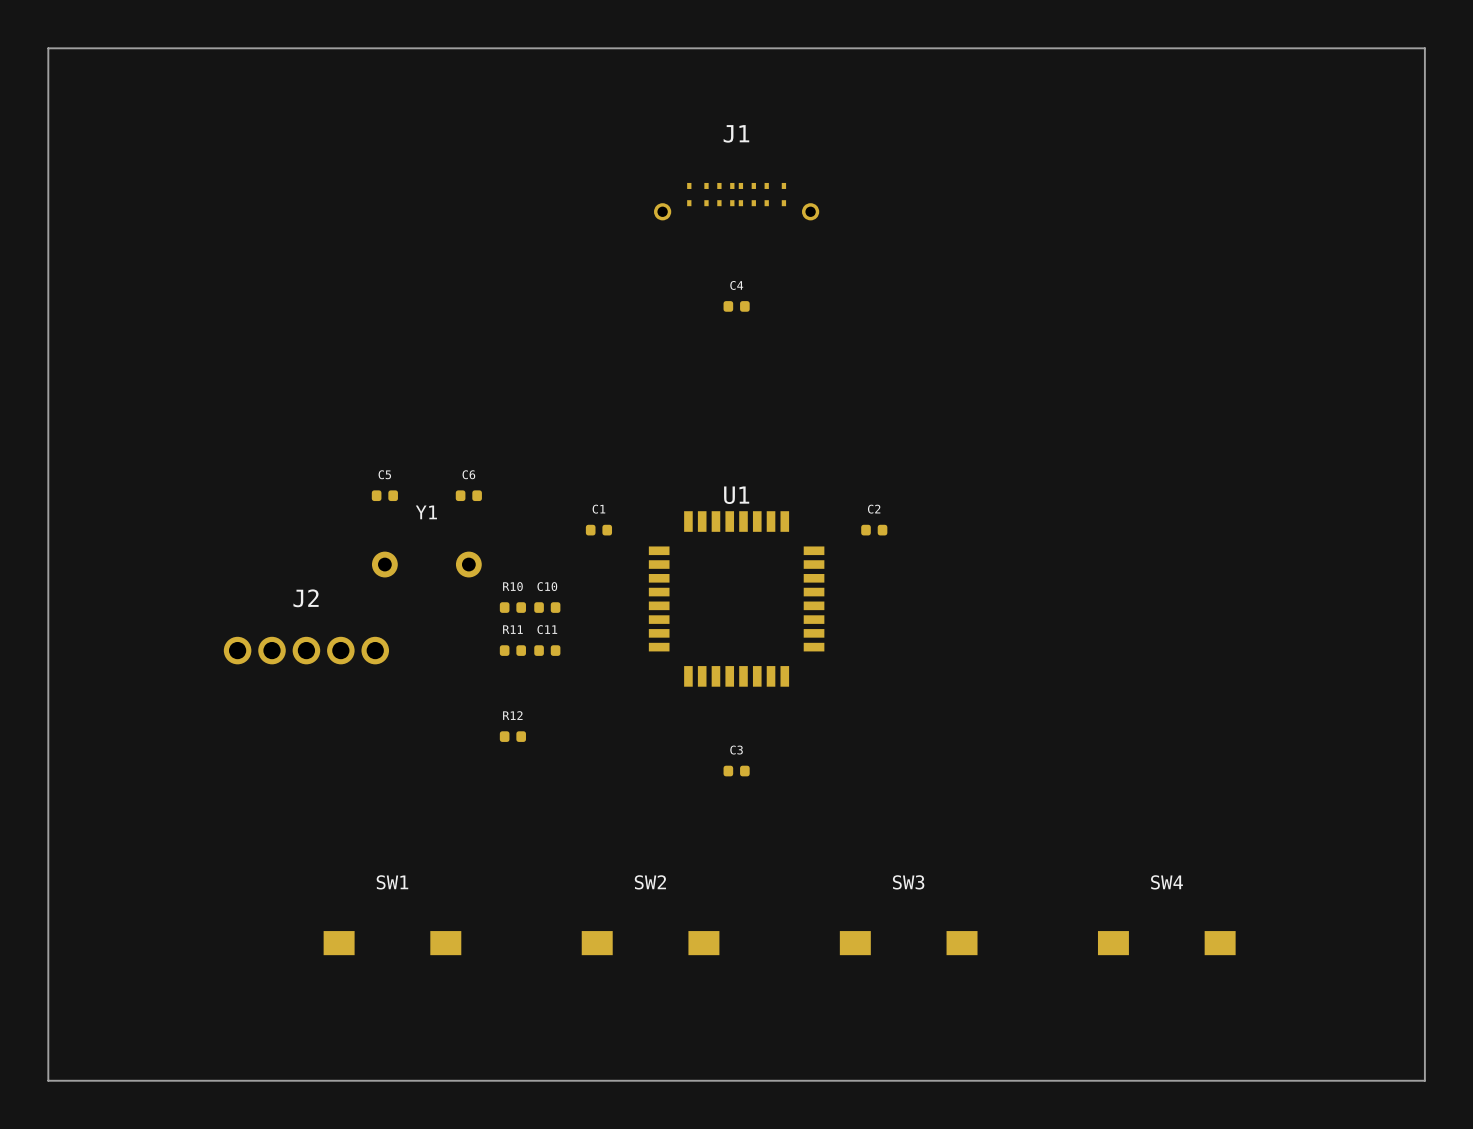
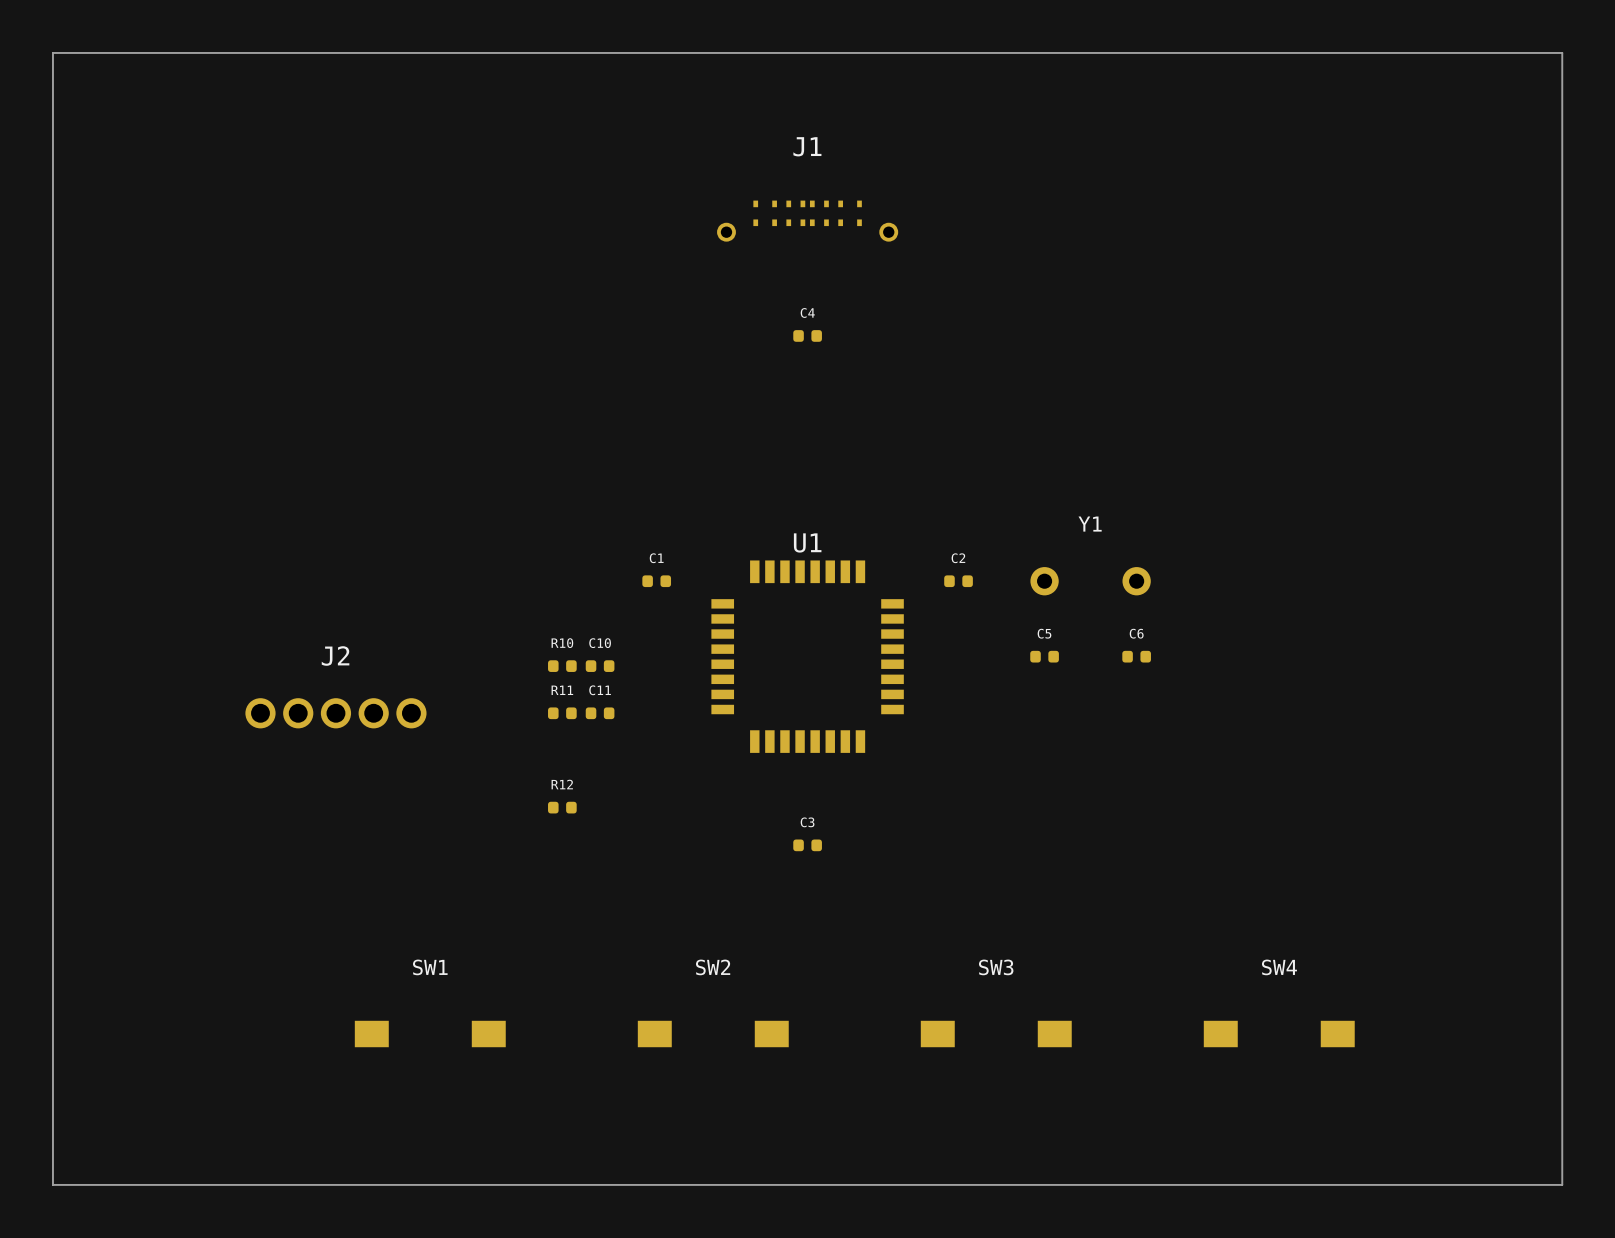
C5 position: (384, 495) -> (1044, 656)
C6 position: (468, 495) -> (1136, 656)
Y1 position: (426, 564) -> (1090, 581)

